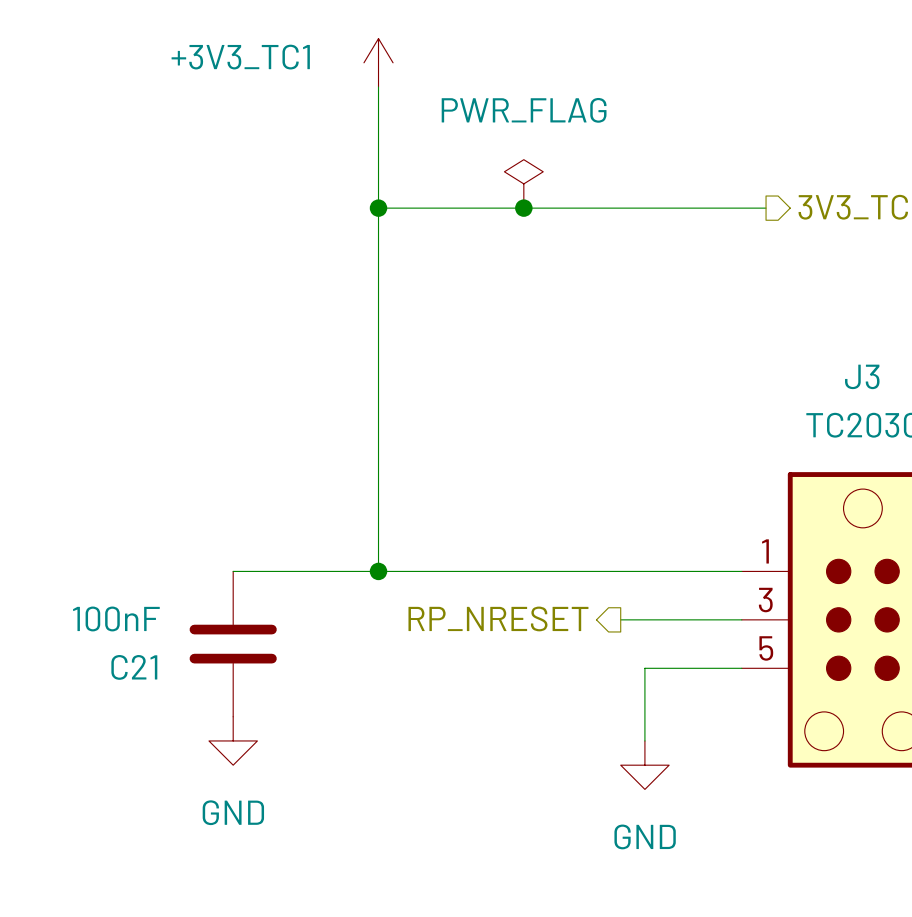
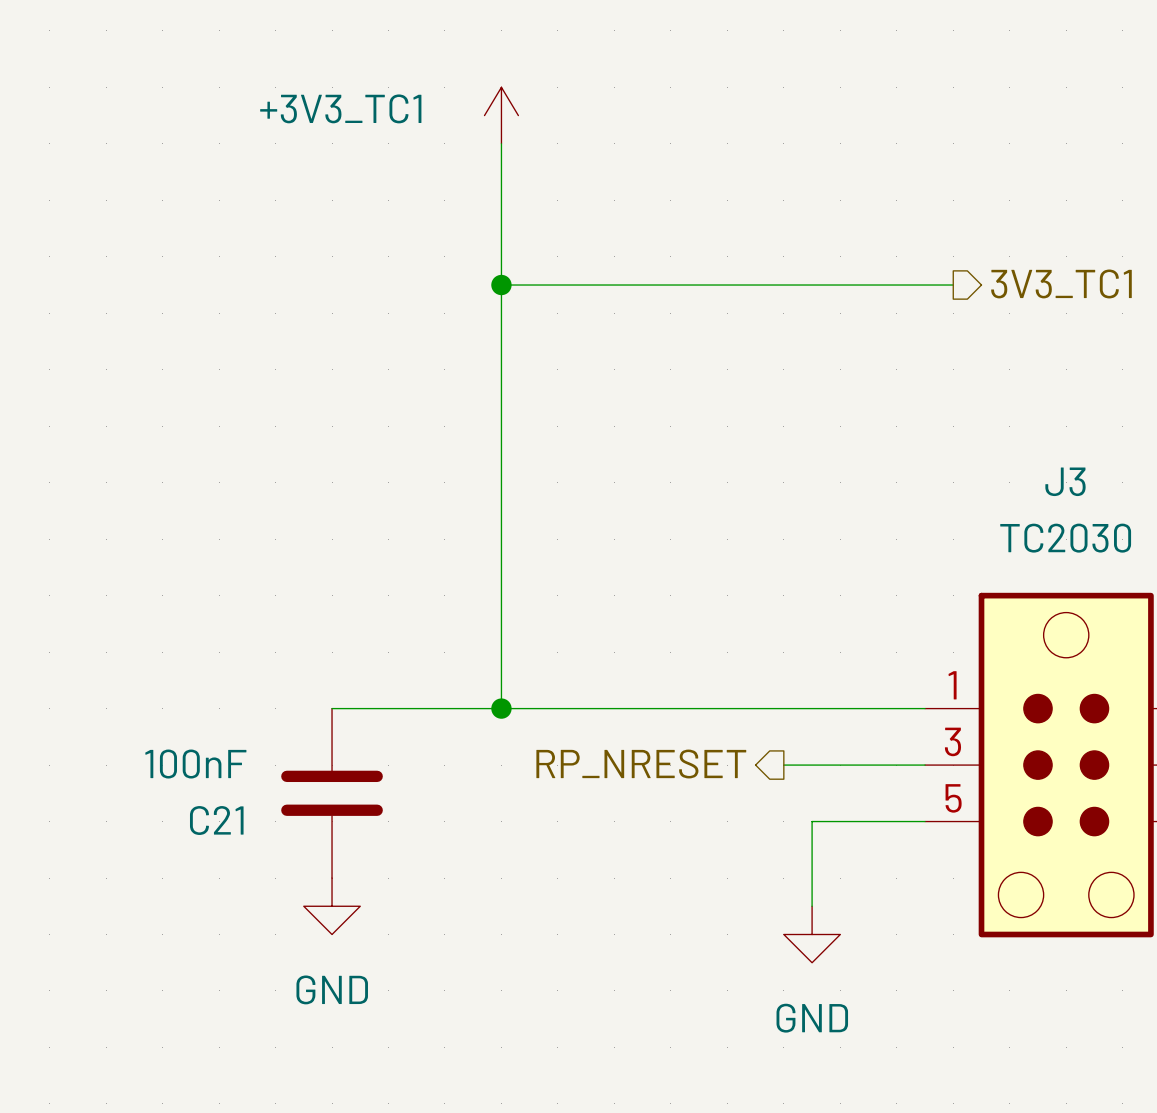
power symbol: PWR_FLAG (523, 183) -> none
junction: (523, 208) -> none

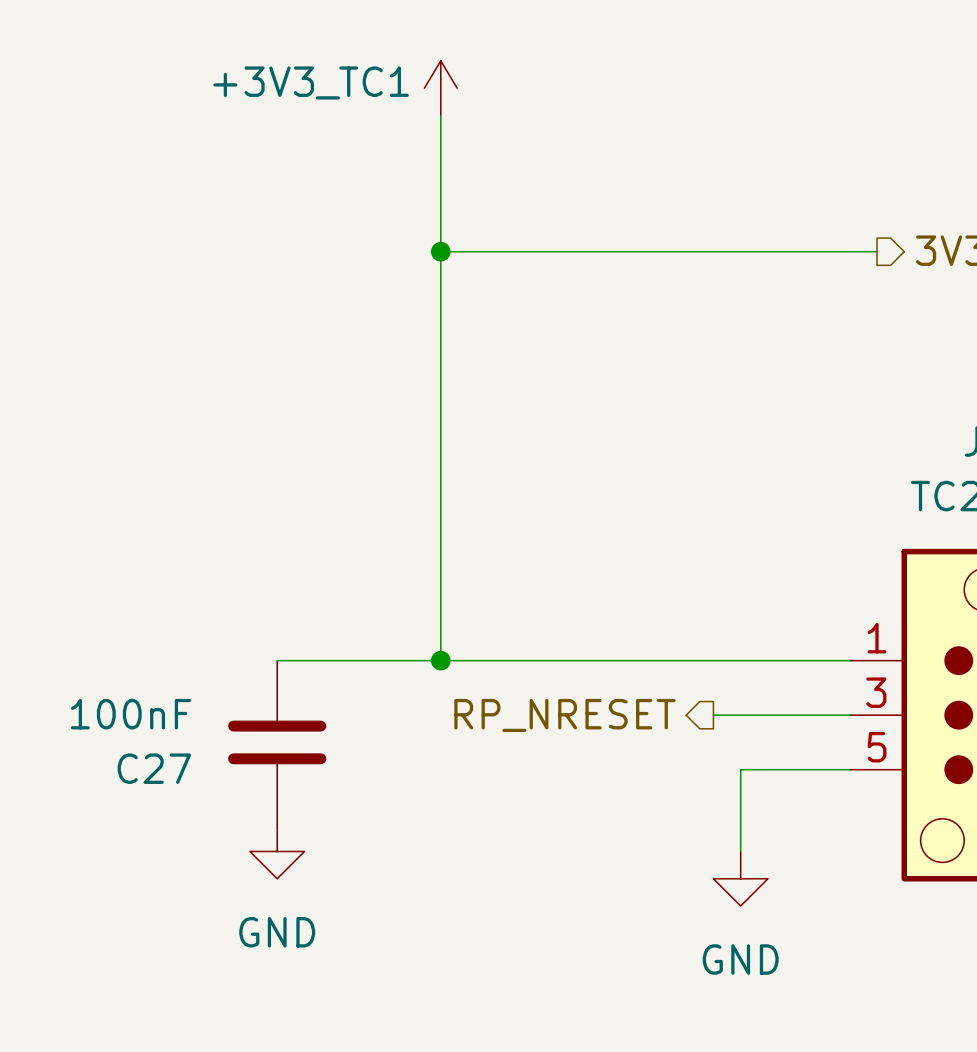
C21 name: C21 (216, 820) -> C27 (154, 768)

